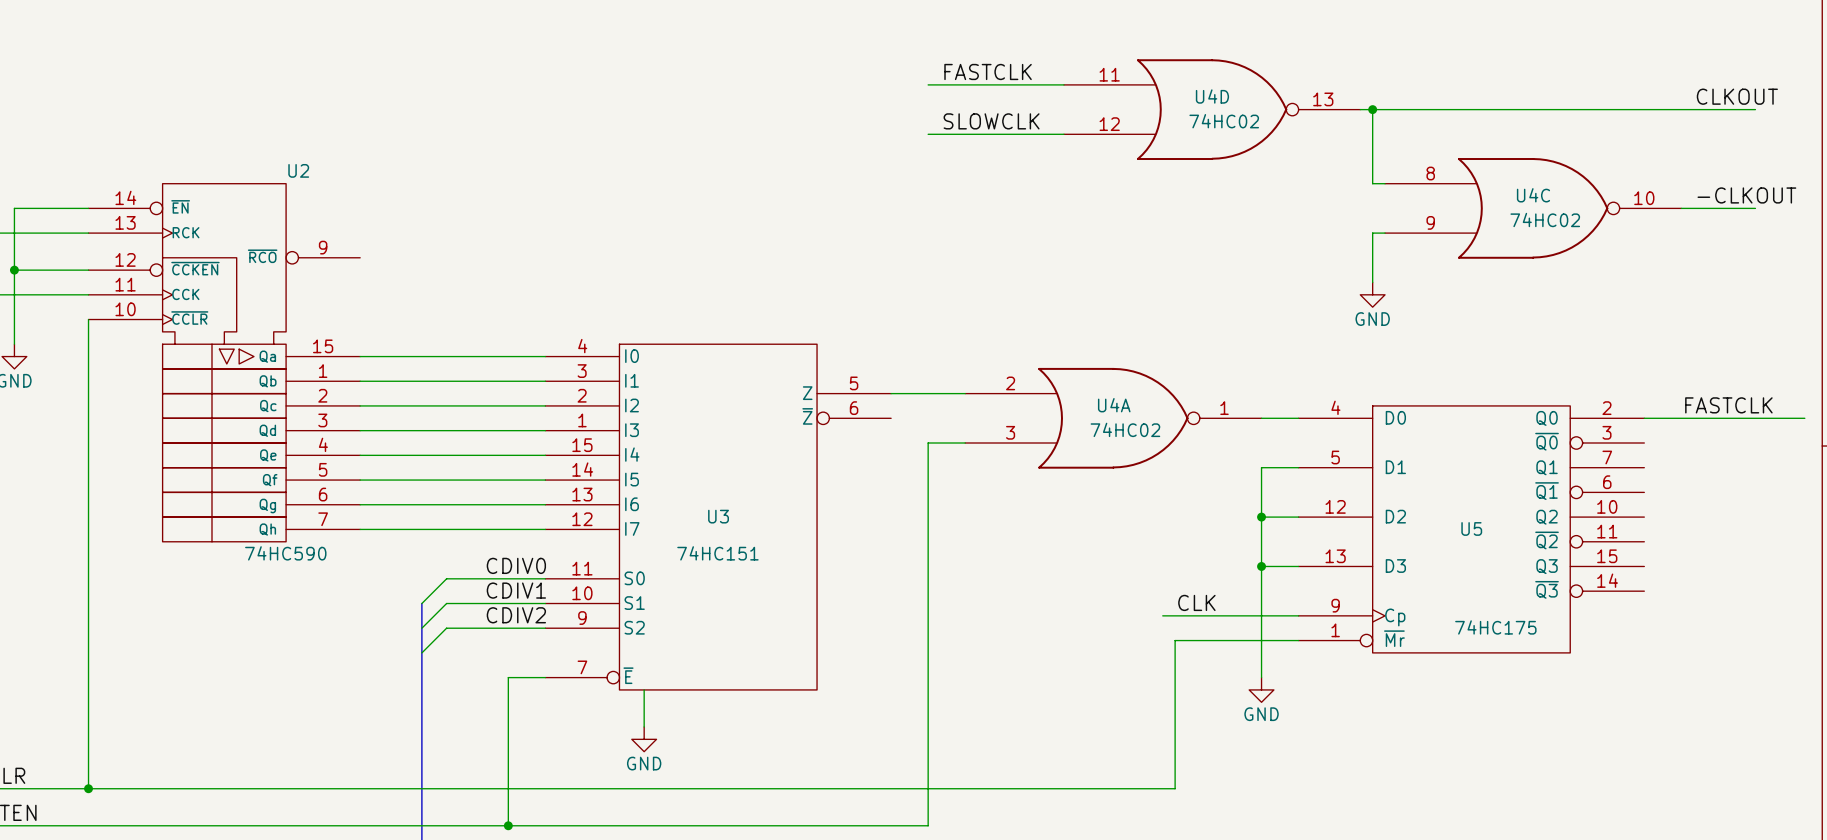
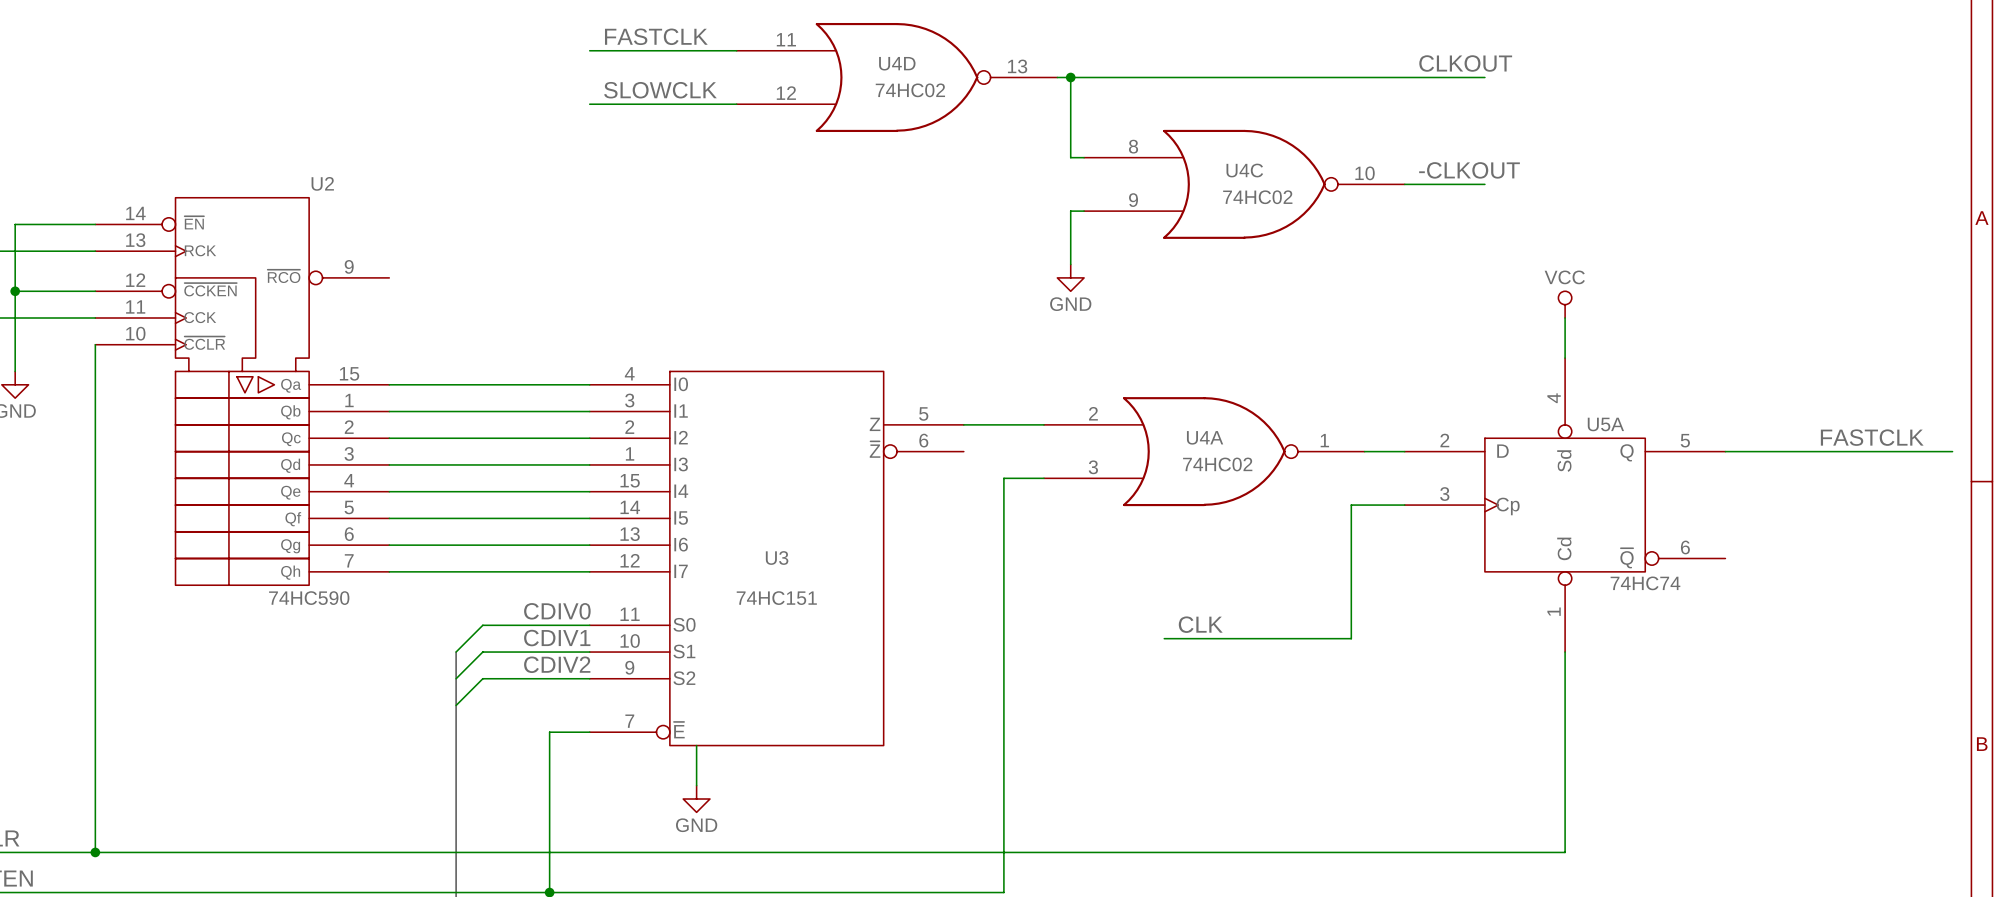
label: none -> FASTCLK (656, 36)
wire: none -> (589, 50) (736, 50)
label: none -> CLKOUT (1465, 63)
label: FASTCLK (988, 71) -> none
wire: none -> (1057, 77) (1484, 77)
wire: none -> (1070, 77) (1070, 157) (1084, 157)
junction: none -> (1070, 77)
label: none -> SLOWCLK (660, 90)
wire: (928, 84) (1063, 84) -> none
label: CLKOUT (1737, 96) -> none
wire: none -> (589, 104) (736, 104)
U4D position: (1212, 109) -> (897, 77)
wire: (1360, 109) (1755, 109) -> none
wire: (1372, 109) (1372, 183) (1385, 183) -> none
junction: (1372, 109) -> none
label: SLOWCLK (991, 121) -> none
wire: (928, 134) (1063, 134) -> none
label: none -> -CLKOUT (1469, 170)
wire: none -> (1404, 184) (1484, 184)
label: -CLKOUT (1746, 195) -> none
wire: none -> (1084, 211) (1070, 211) (1070, 264)
U4C position: (1533, 208) -> (1244, 184)
wire: (1681, 208) (1755, 208) -> none
wire: (1385, 233) (1372, 233) (1372, 282) -> none
power symbol: none -> GND (1070, 277)
power symbol: none -> VCC (1565, 304)
power symbol: GND (1372, 294) -> none
wire: none -> (1565, 318) (1565, 358)
wire: (1261, 467) (1261, 677) -> (1364, 505) (1351, 505) (1351, 638) (1164, 638)
U5A: none -> 74HC74 (1565, 505)
wire: (1261, 517) (1298, 517) -> none
junction: (1261, 517) -> none
U5: 74HC175 (1471, 529) -> none
wire: (1261, 566) (1298, 566) -> none
junction: (1261, 566) -> none
label position: CLK (1196, 602) -> CLK (1200, 624)
wire: (1162, 615) (1298, 615) -> none
wire: (1298, 640) (1175, 640) (1175, 788) -> (1565, 652) (1565, 852) (1271, 852)
power symbol: GND (1261, 689) -> none

